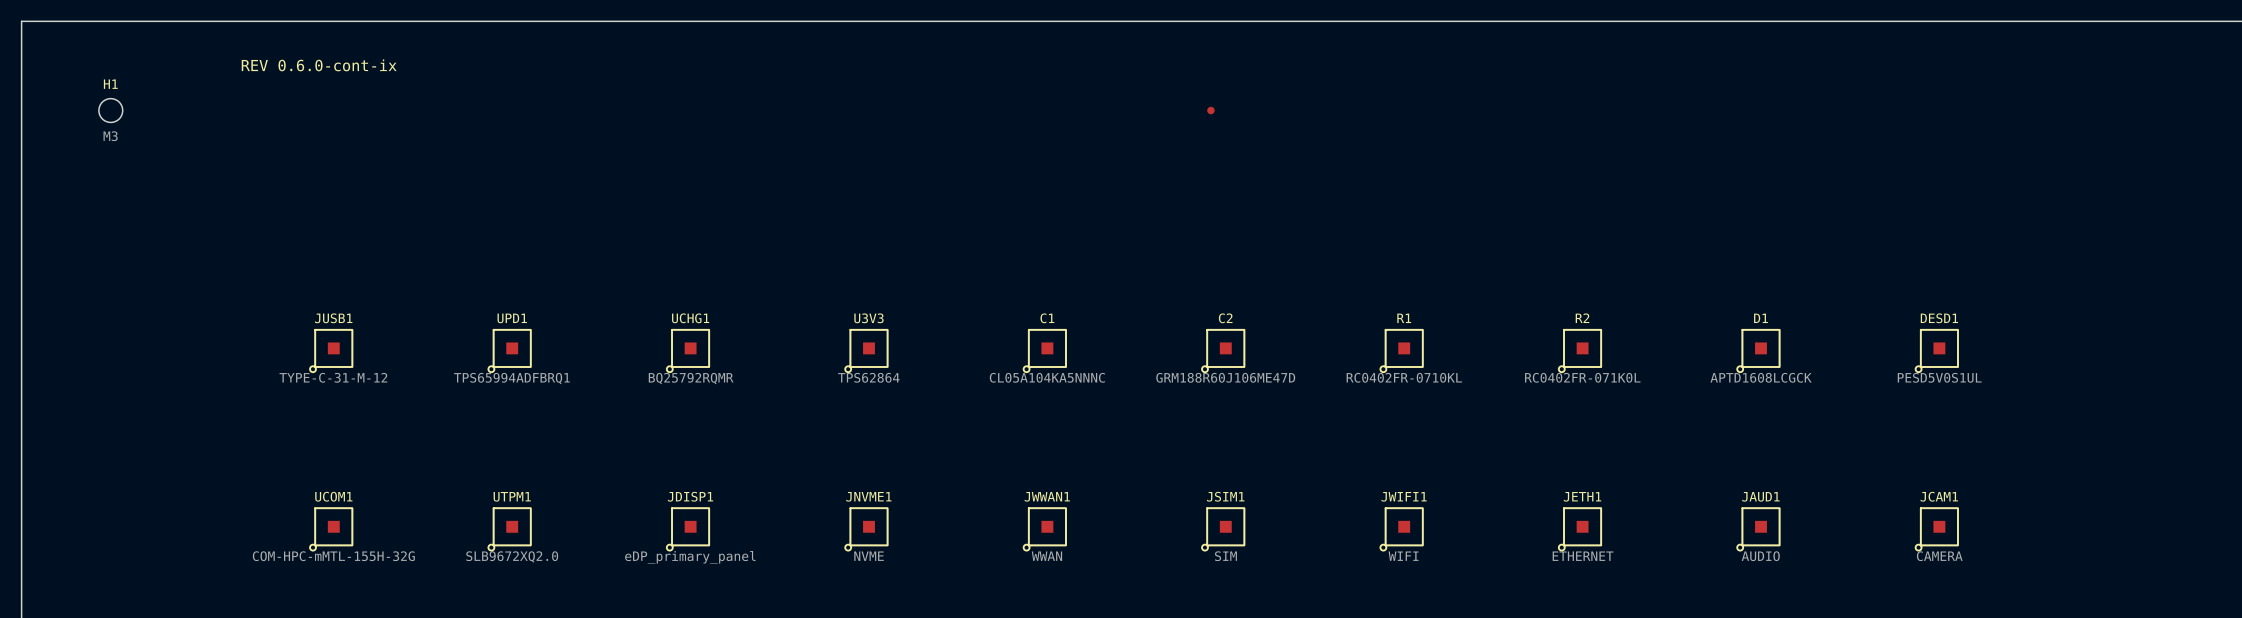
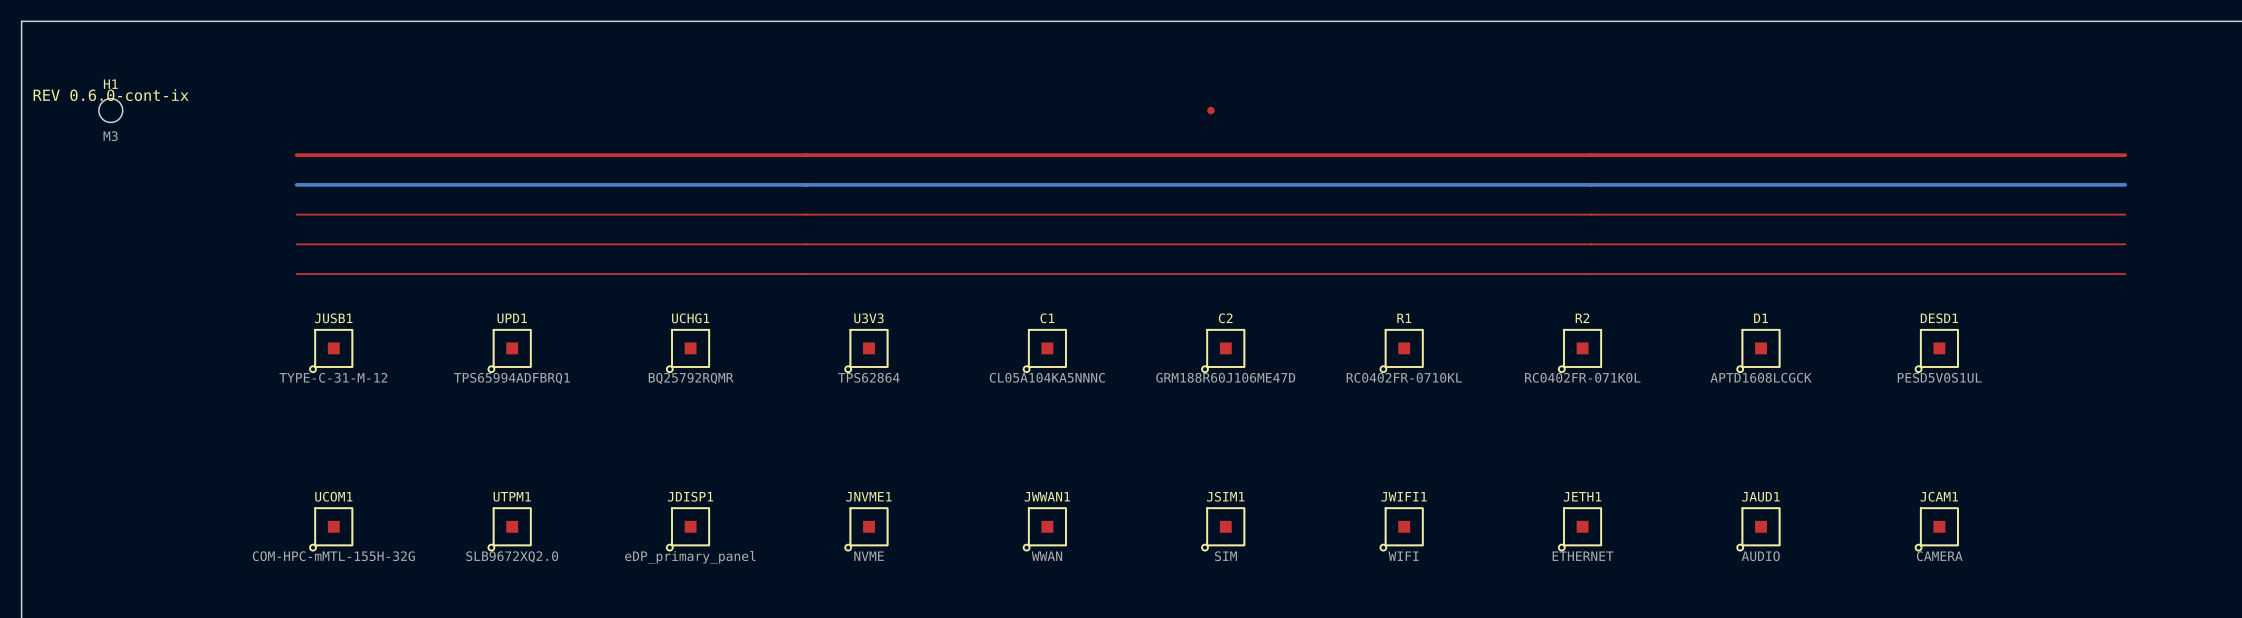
text: REV 0.6.0-cont-ix (319, 65) -> none
text: none -> REV 0.6.0-cont-ix (111, 95)
top track: none -> (296, 155) (2125, 155)
bottom track: none -> (296, 184) (2125, 184)
top track: none -> (296, 214) (2125, 214)
top track: none -> (296, 244) (2125, 244)
top track: none -> (296, 274) (2125, 274)

